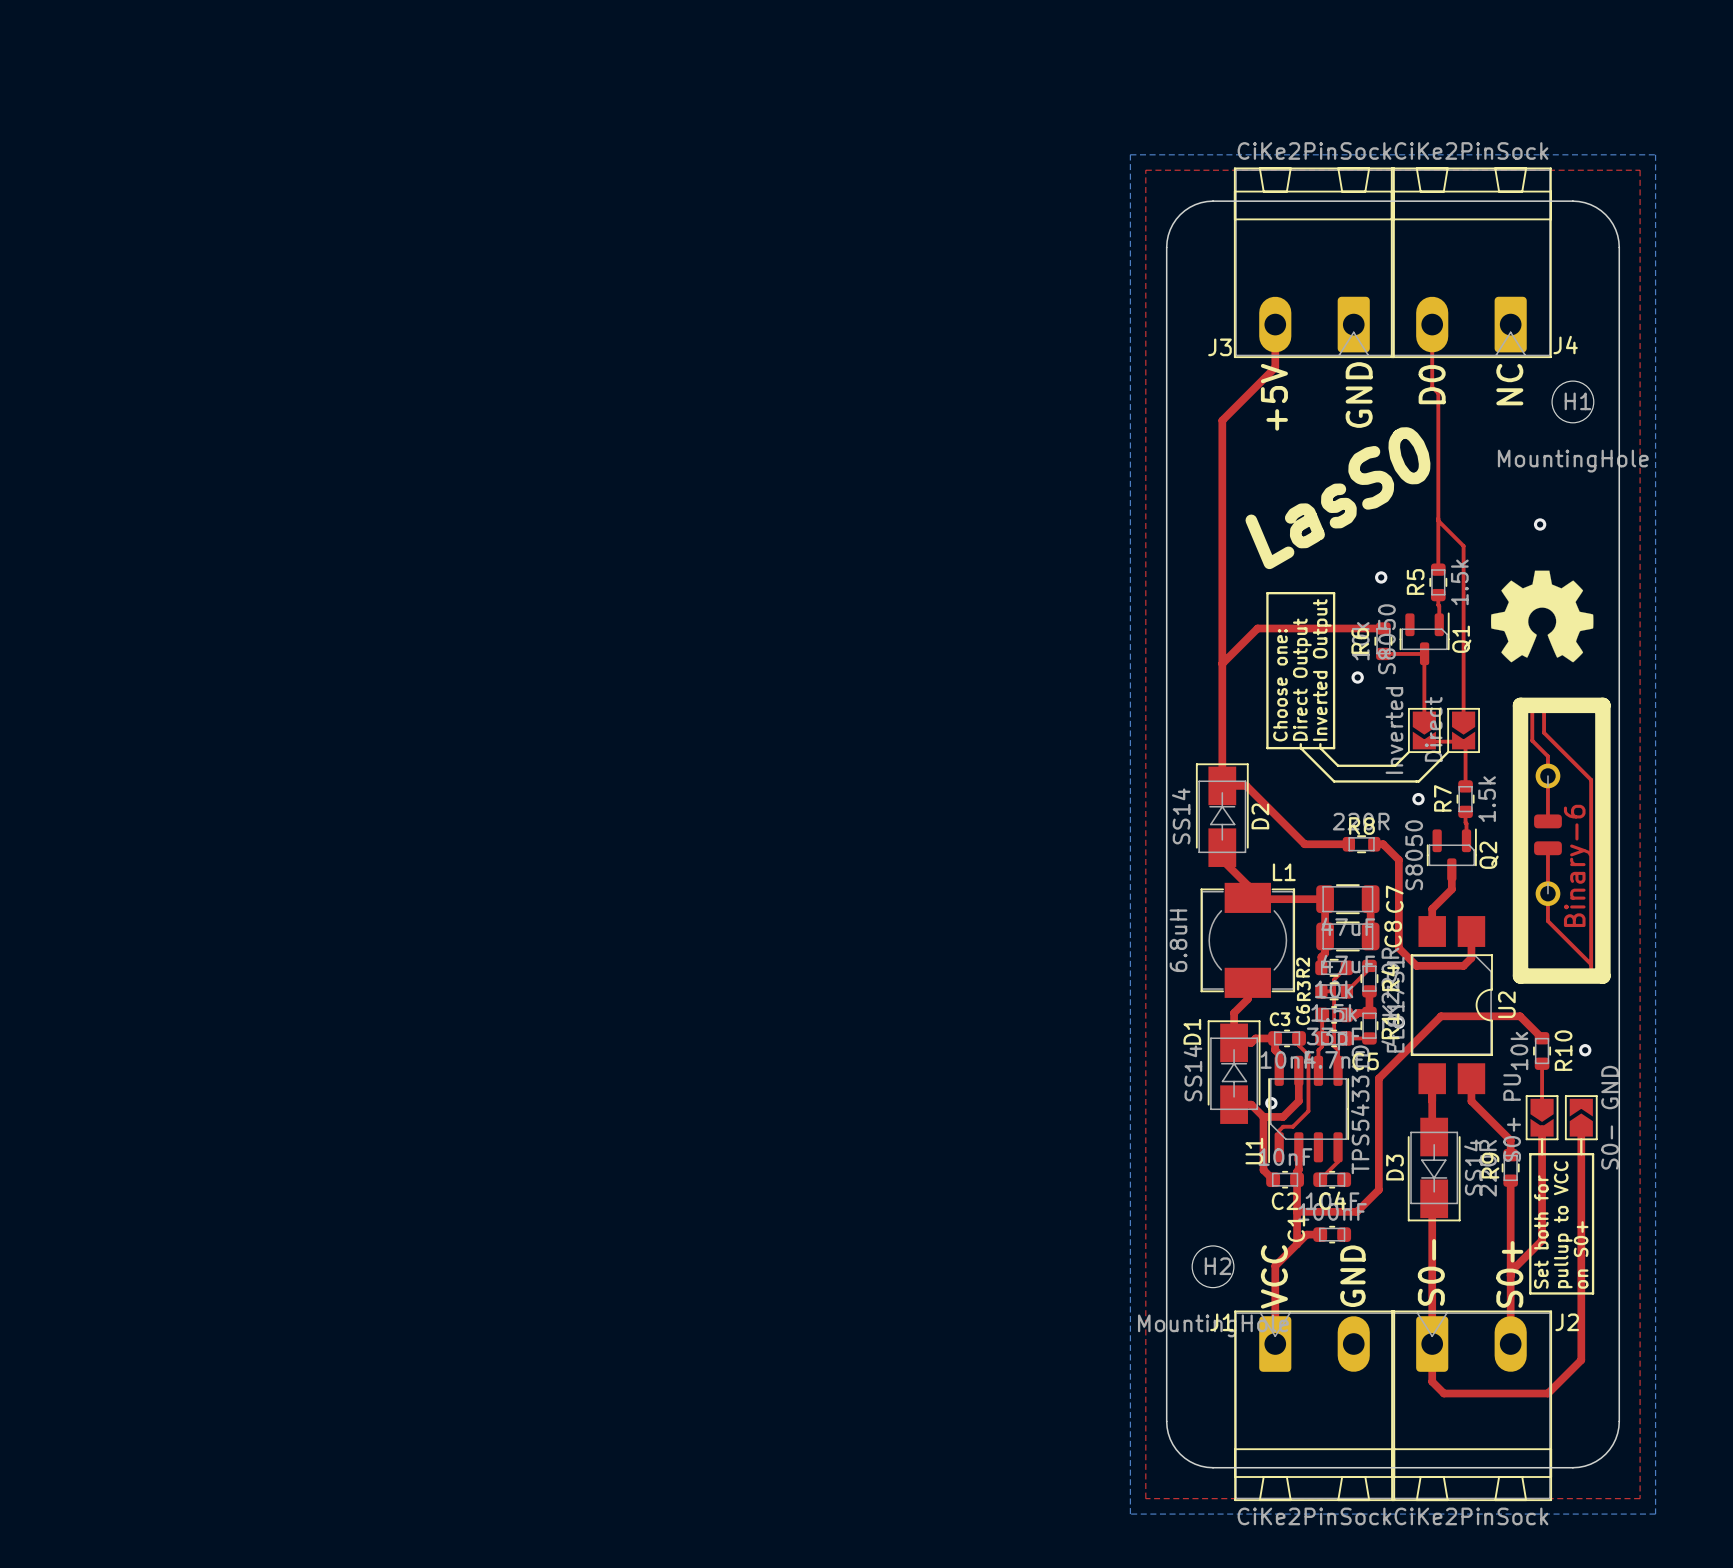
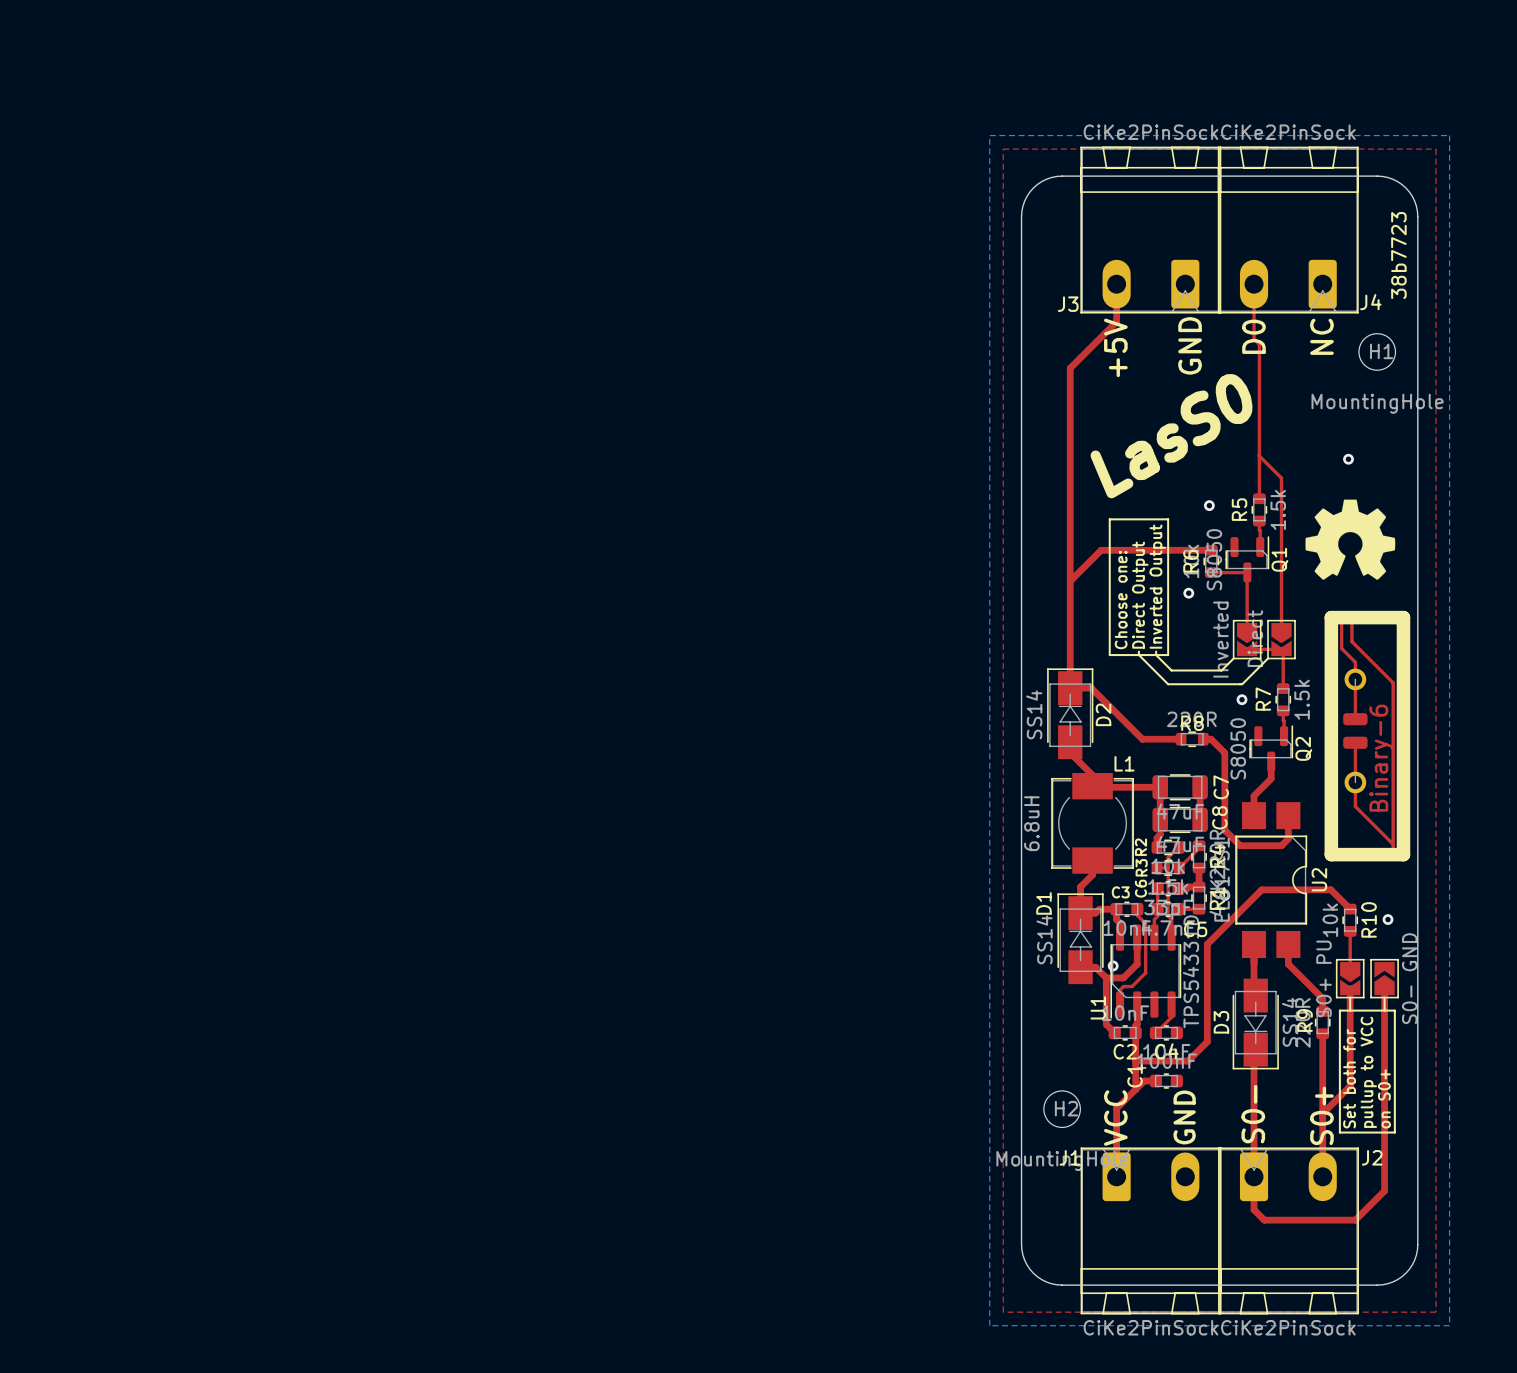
text: none -> 38b7723 (1398, 255)

